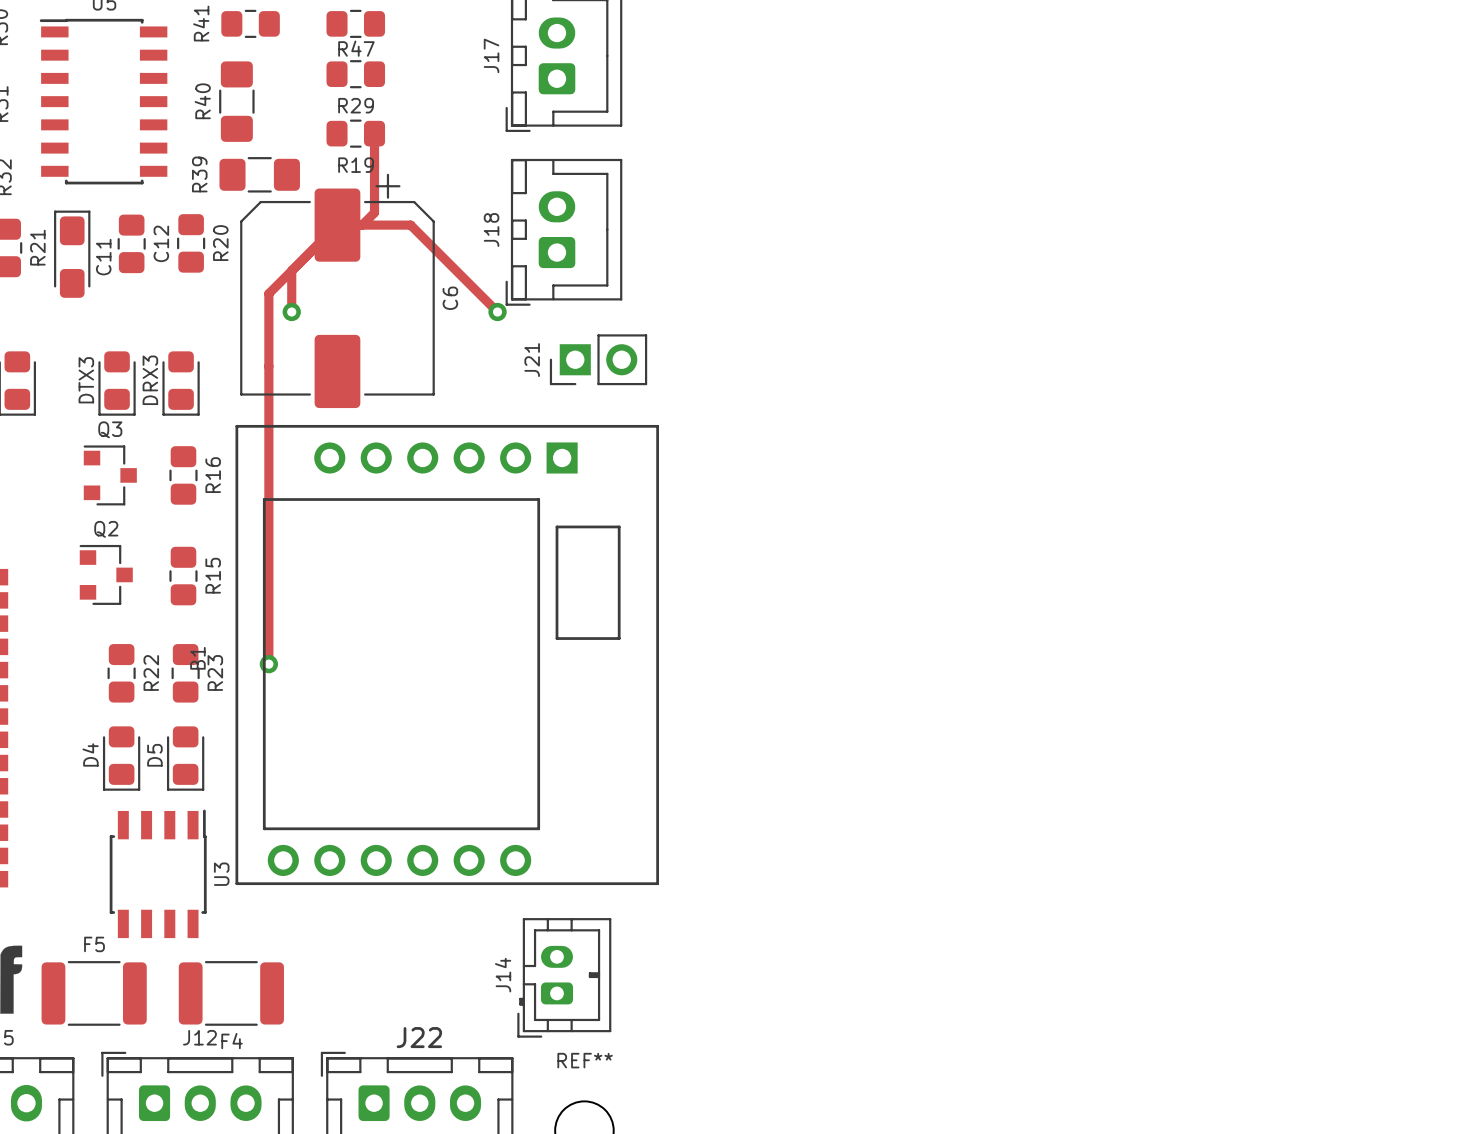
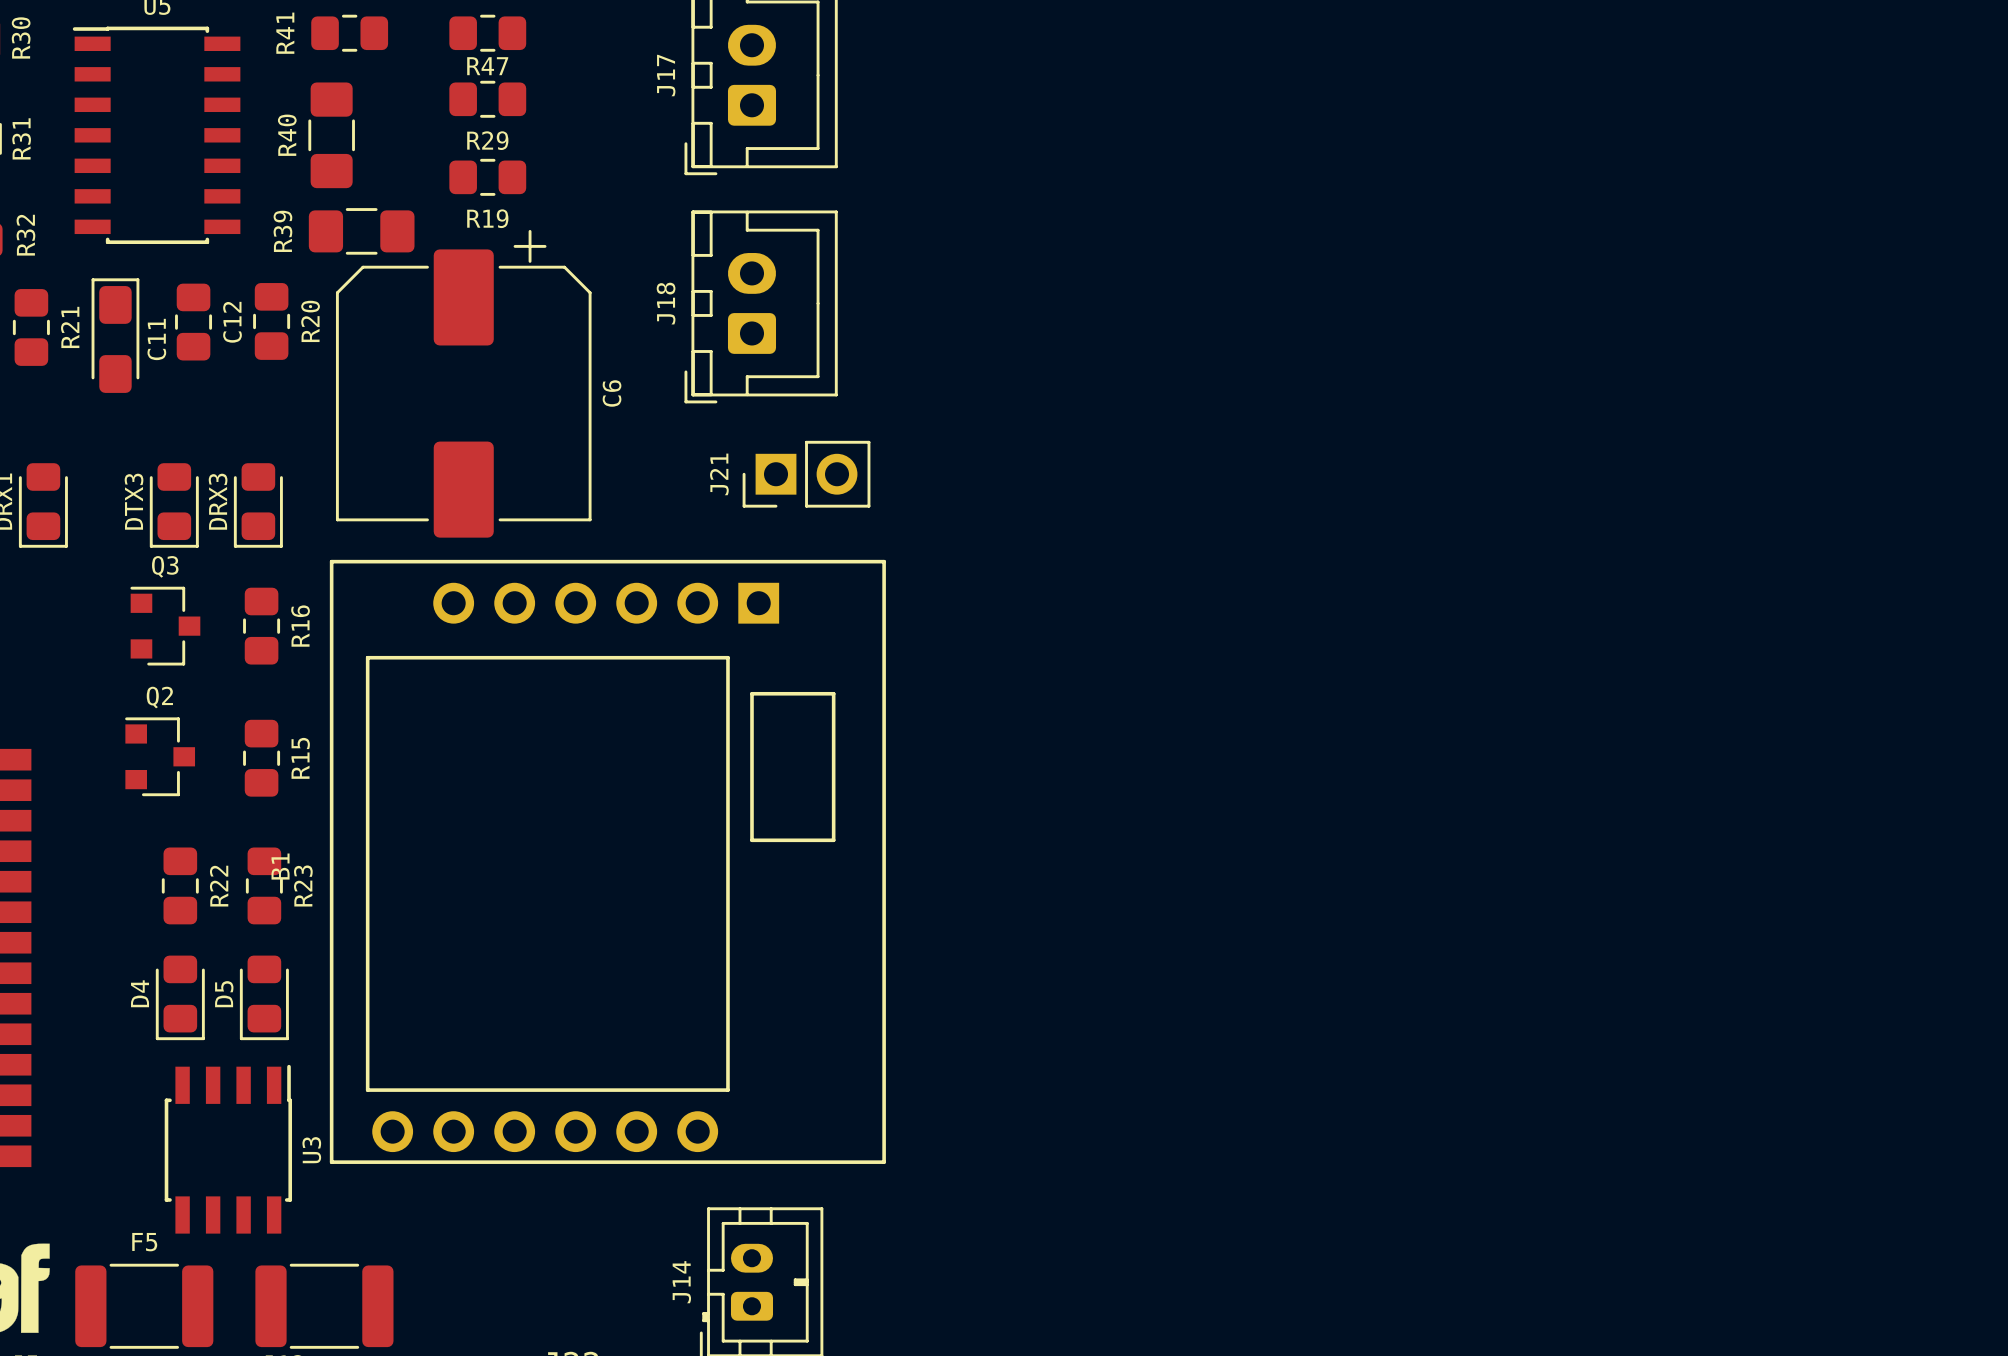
track: (374, 133) (374, 212) (362, 225) -> none
track: (291, 270) (291, 312) -> none
via: (291, 312) -> none
track: (497, 312) (410, 225) (337, 225) (268, 293) (268, 664) -> none
via: (497, 312) -> none
via: (268, 664) -> none

